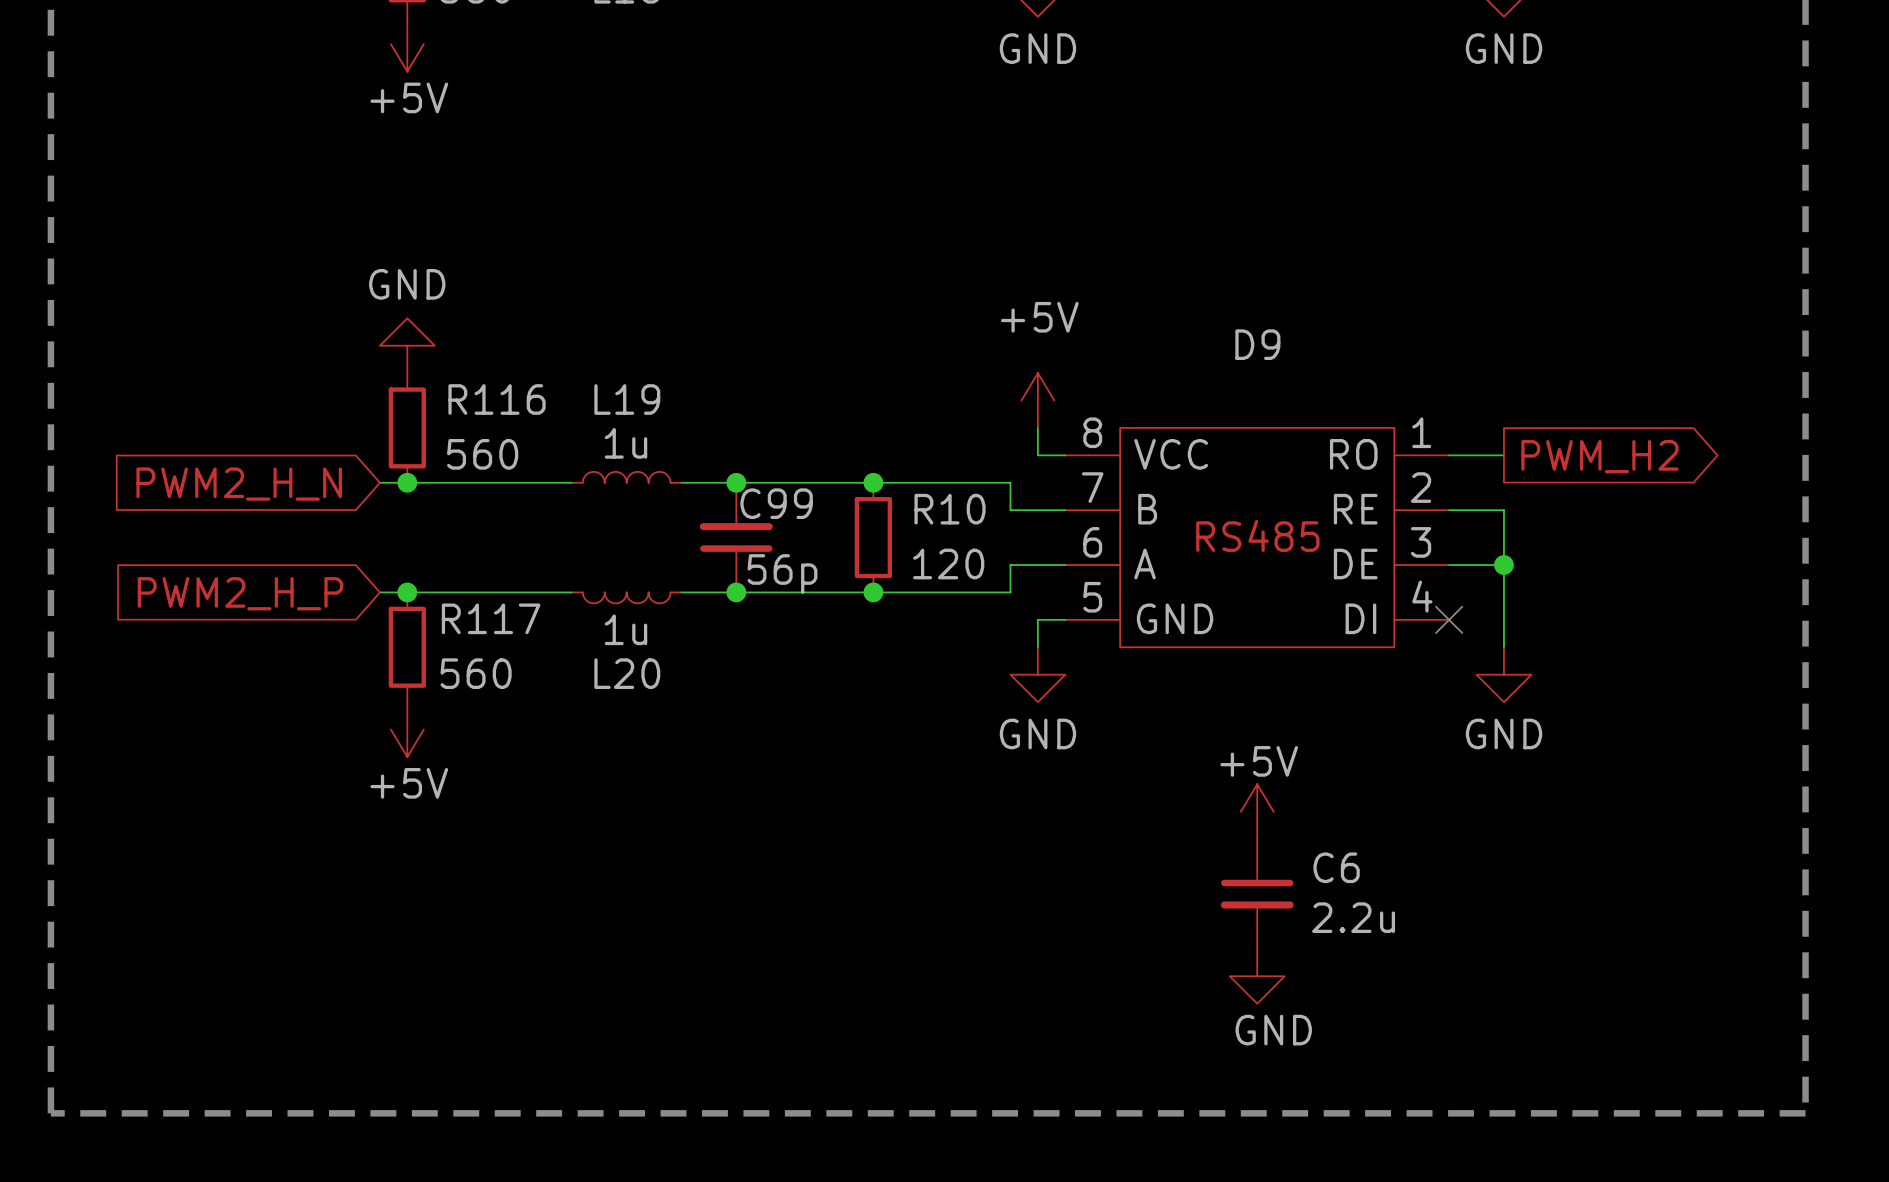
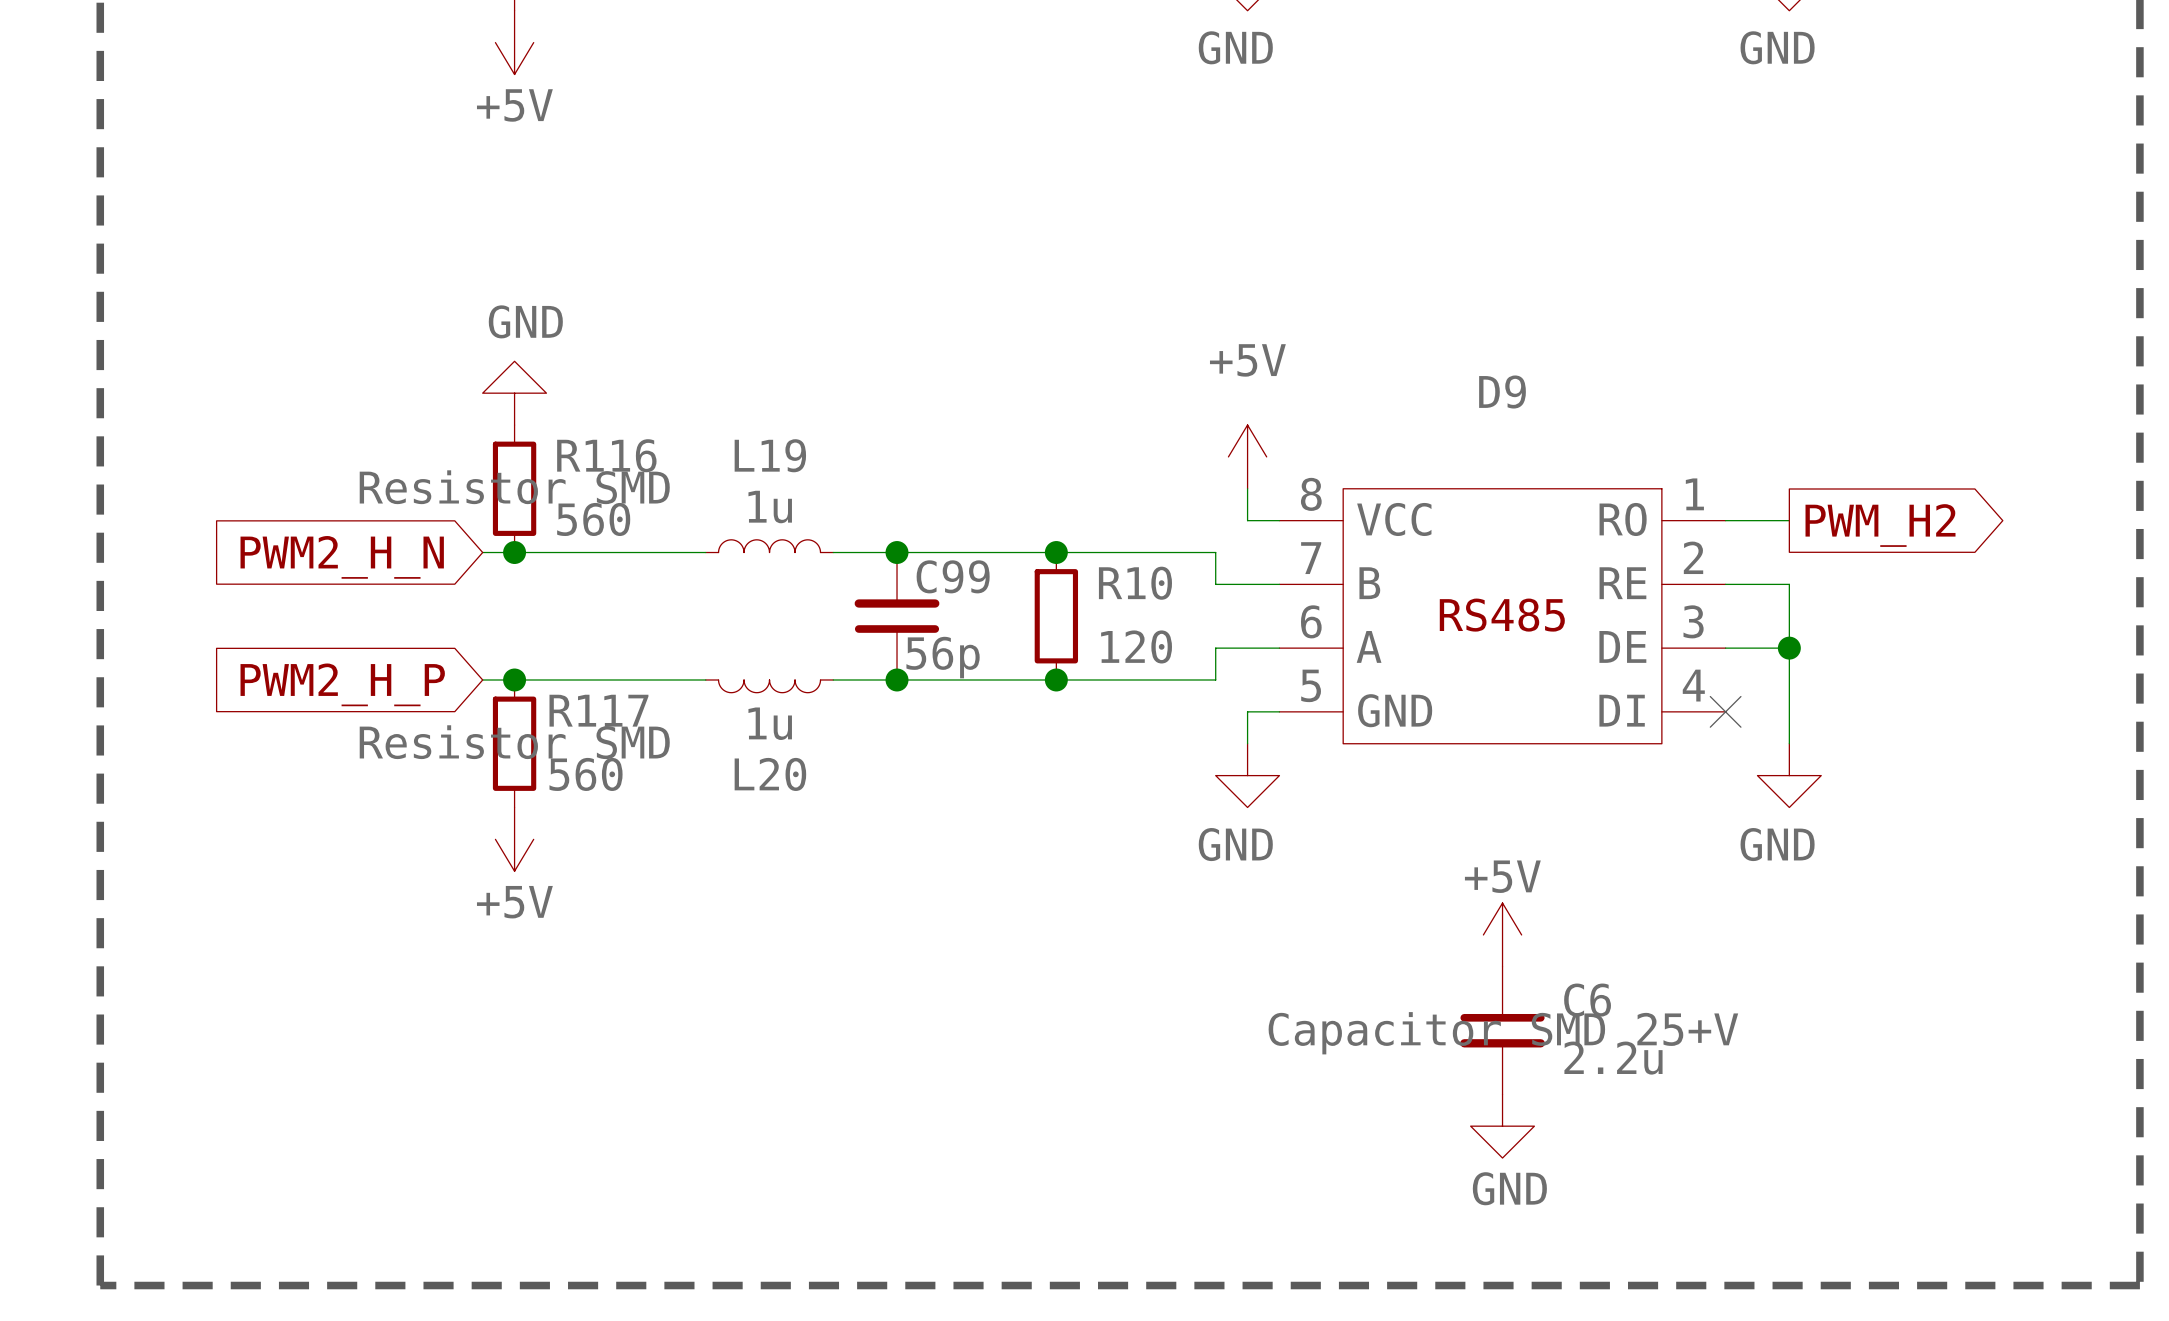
R116 text: none -> Resistor SMD (514, 487)
R117 text: none -> Resistor SMD (514, 742)
C6 text: none -> Capacitor SMD 25+V (1503, 1033)

